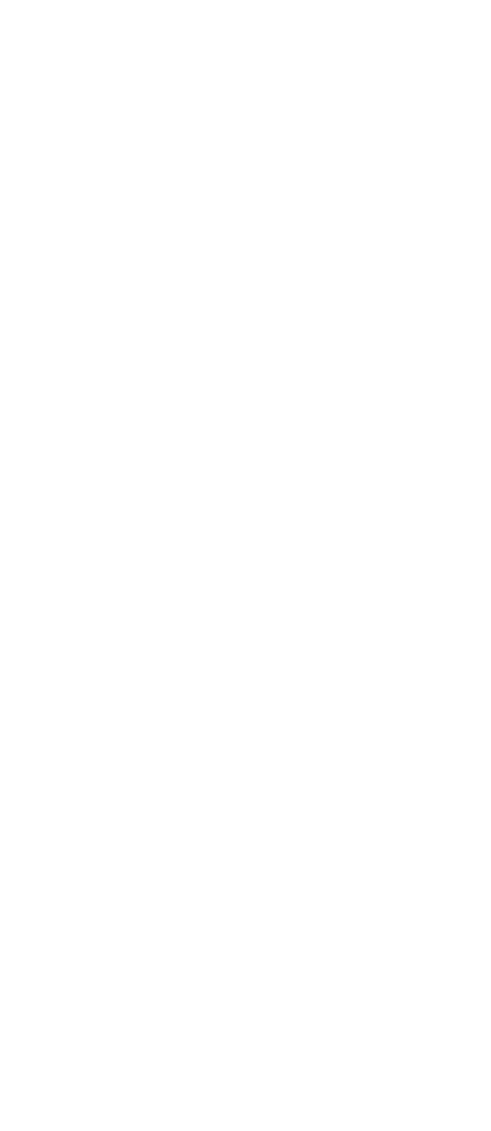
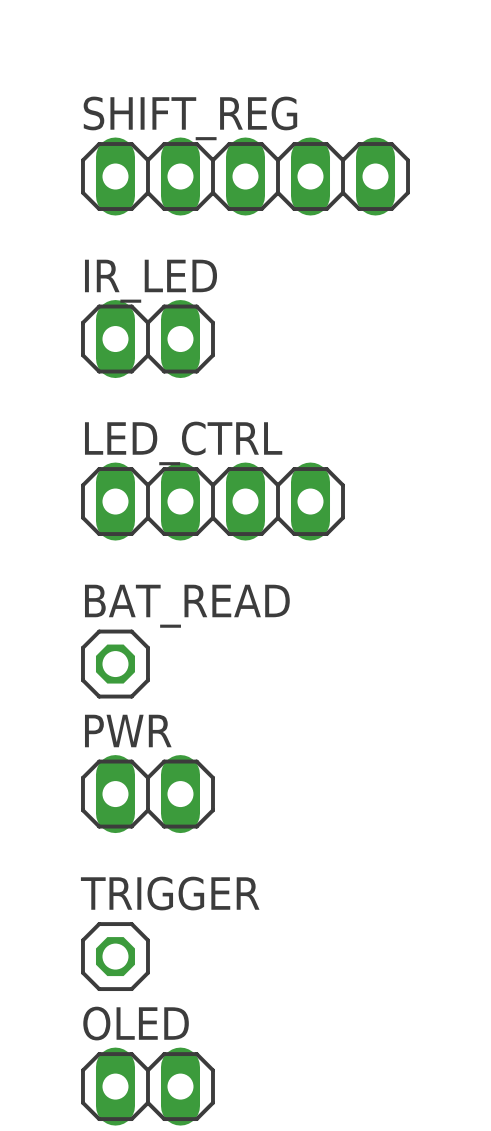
SHIFT_REG: none -> (245, 176)
IR_LED: none -> (147, 339)
LED_CTRL: none -> (212, 501)
BAT_READ: none -> (115, 664)
PWR: none -> (147, 794)
TRIGGER: none -> (115, 956)
OLED: none -> (147, 1086)

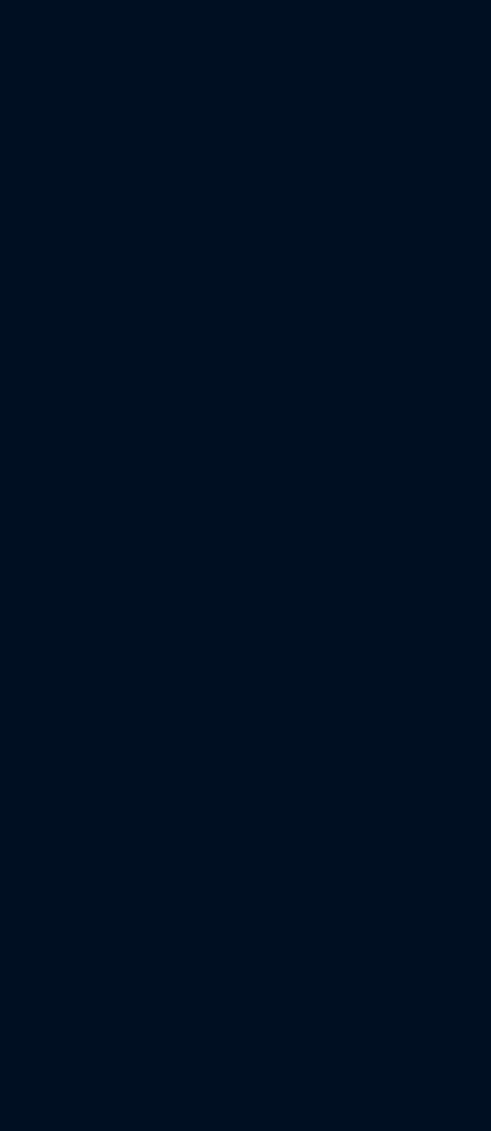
SHIFT_REG: (245, 176) -> none
IR_LED: (147, 339) -> none
LED_CTRL: (212, 501) -> none
BAT_READ: (115, 664) -> none
PWR: (147, 794) -> none
TRIGGER: (115, 956) -> none
OLED: (147, 1086) -> none

